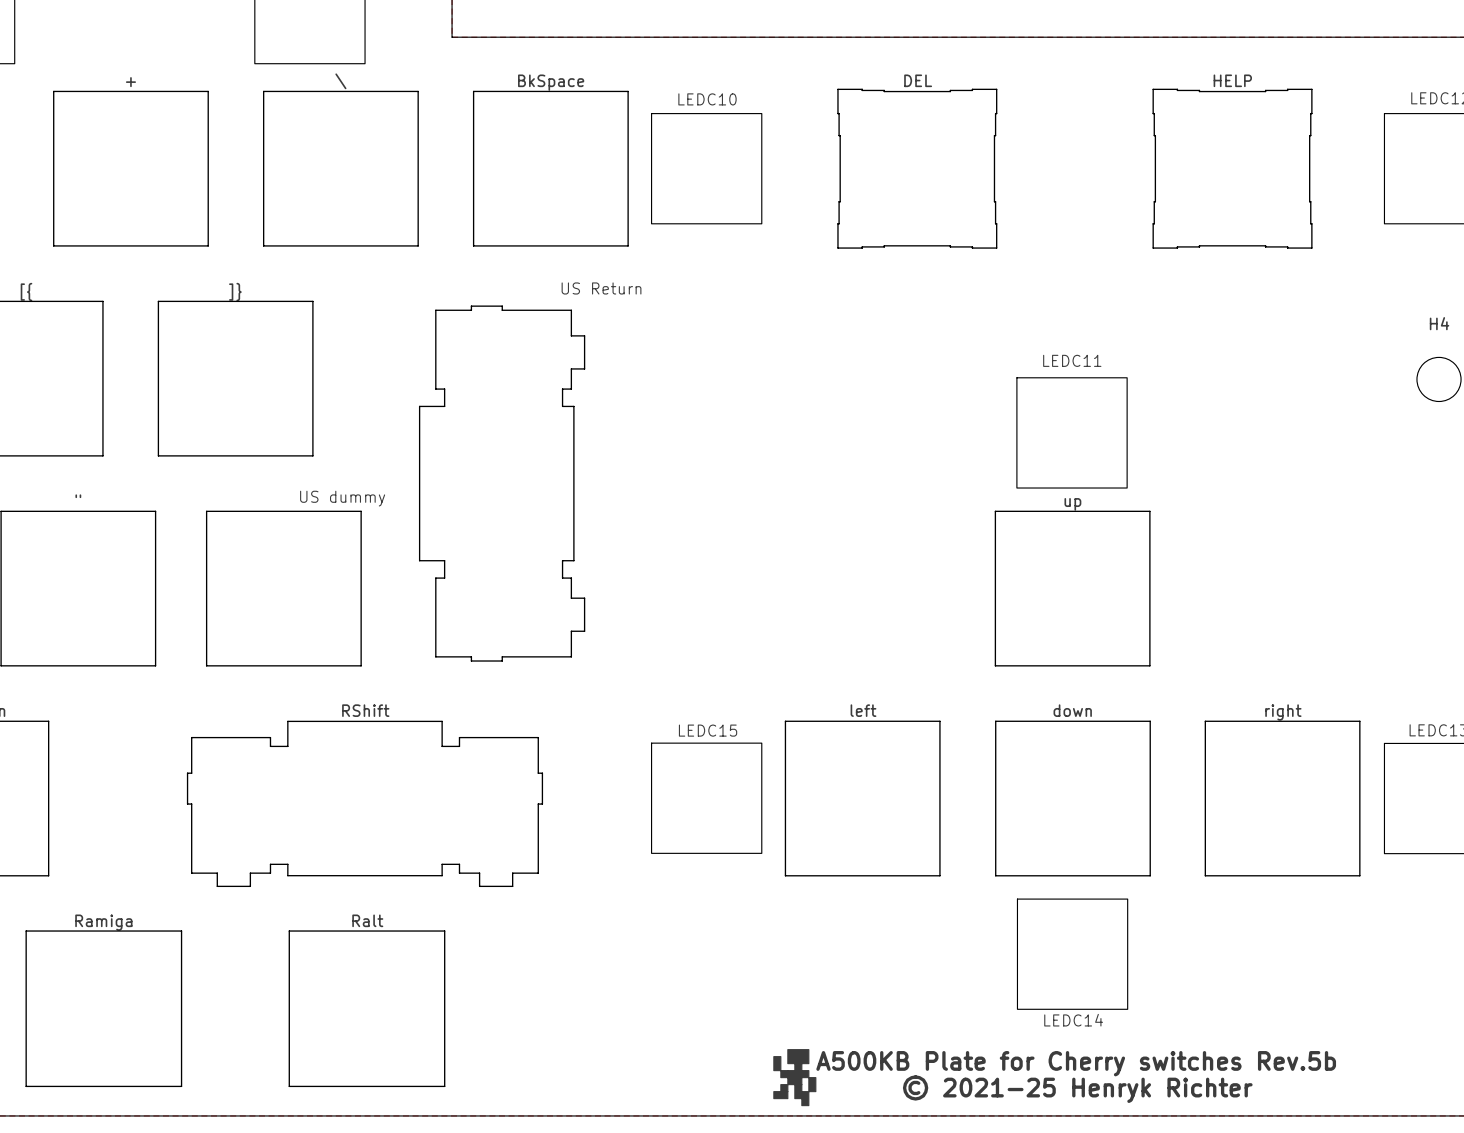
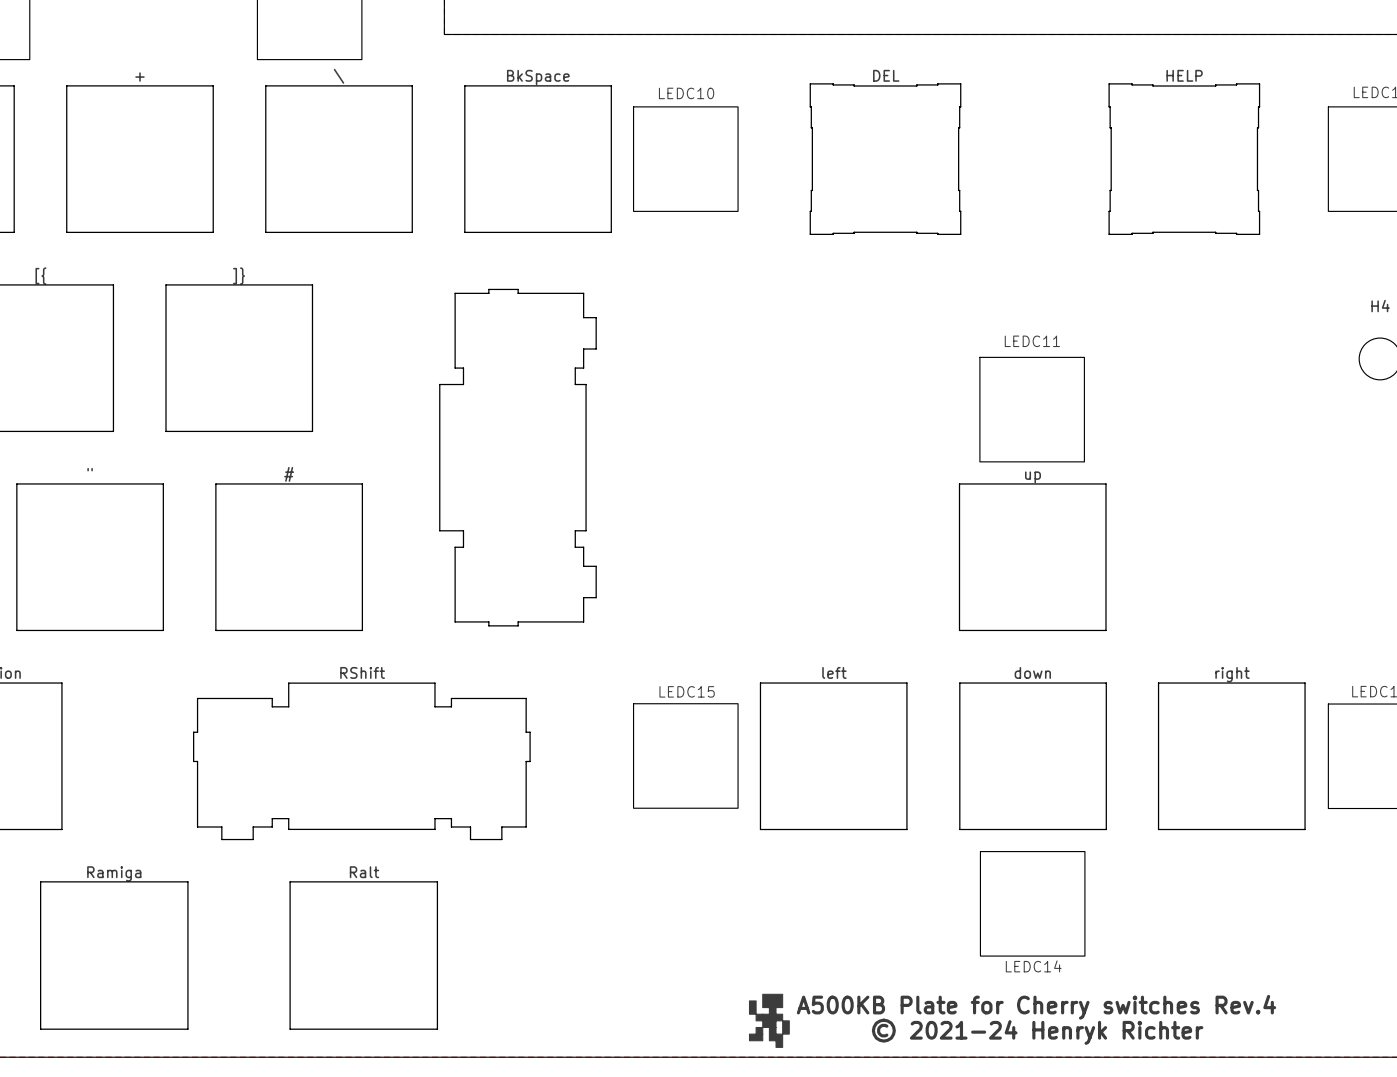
drawing: [205, 305, 586, 667] -> none
drawing: none -> [439, 288, 597, 627]
drawing: none -> [215, 483, 364, 632]
text: A500KB Plate for Cherry switches Rev.5b (1076, 1063) -> A500KB Plate for Cherry switches Rev.4 (1036, 1007)
text: © 2021-25 Henryk Richter (1077, 1089) -> © 2021-24 Henryk Richter (1037, 1031)

